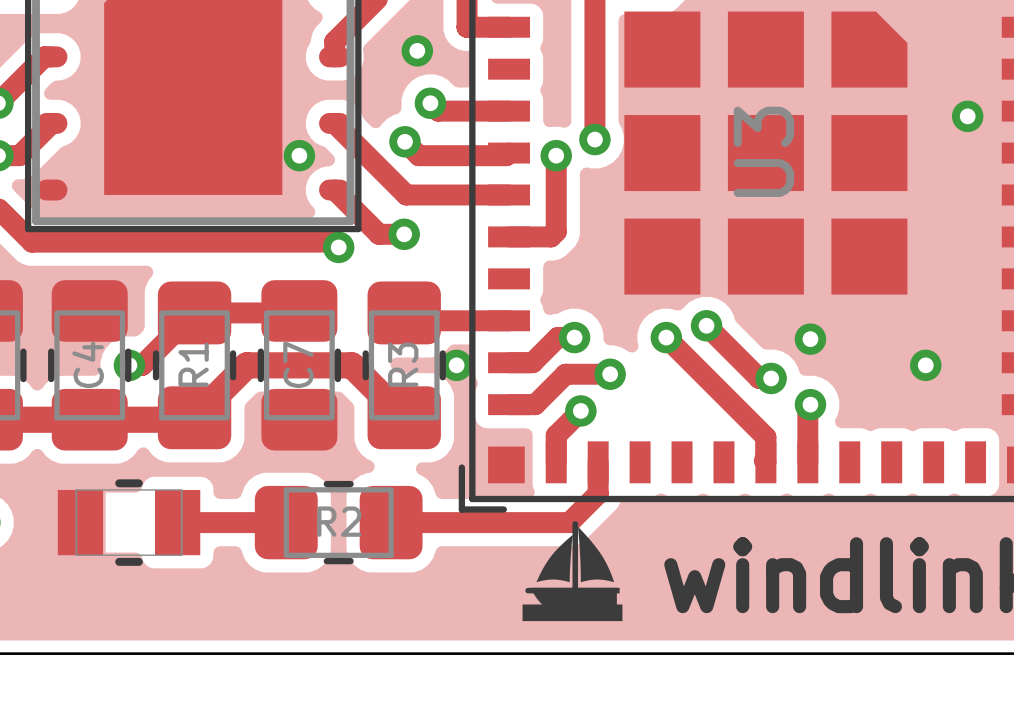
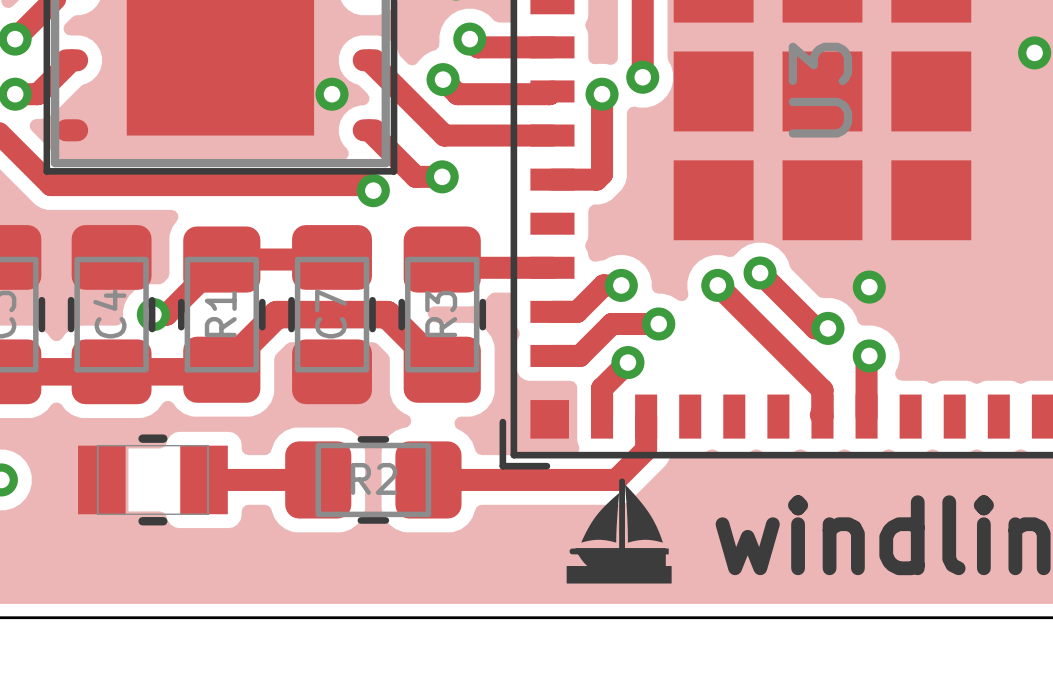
via: (456, 365) -> none
via: (925, 365) -> none

